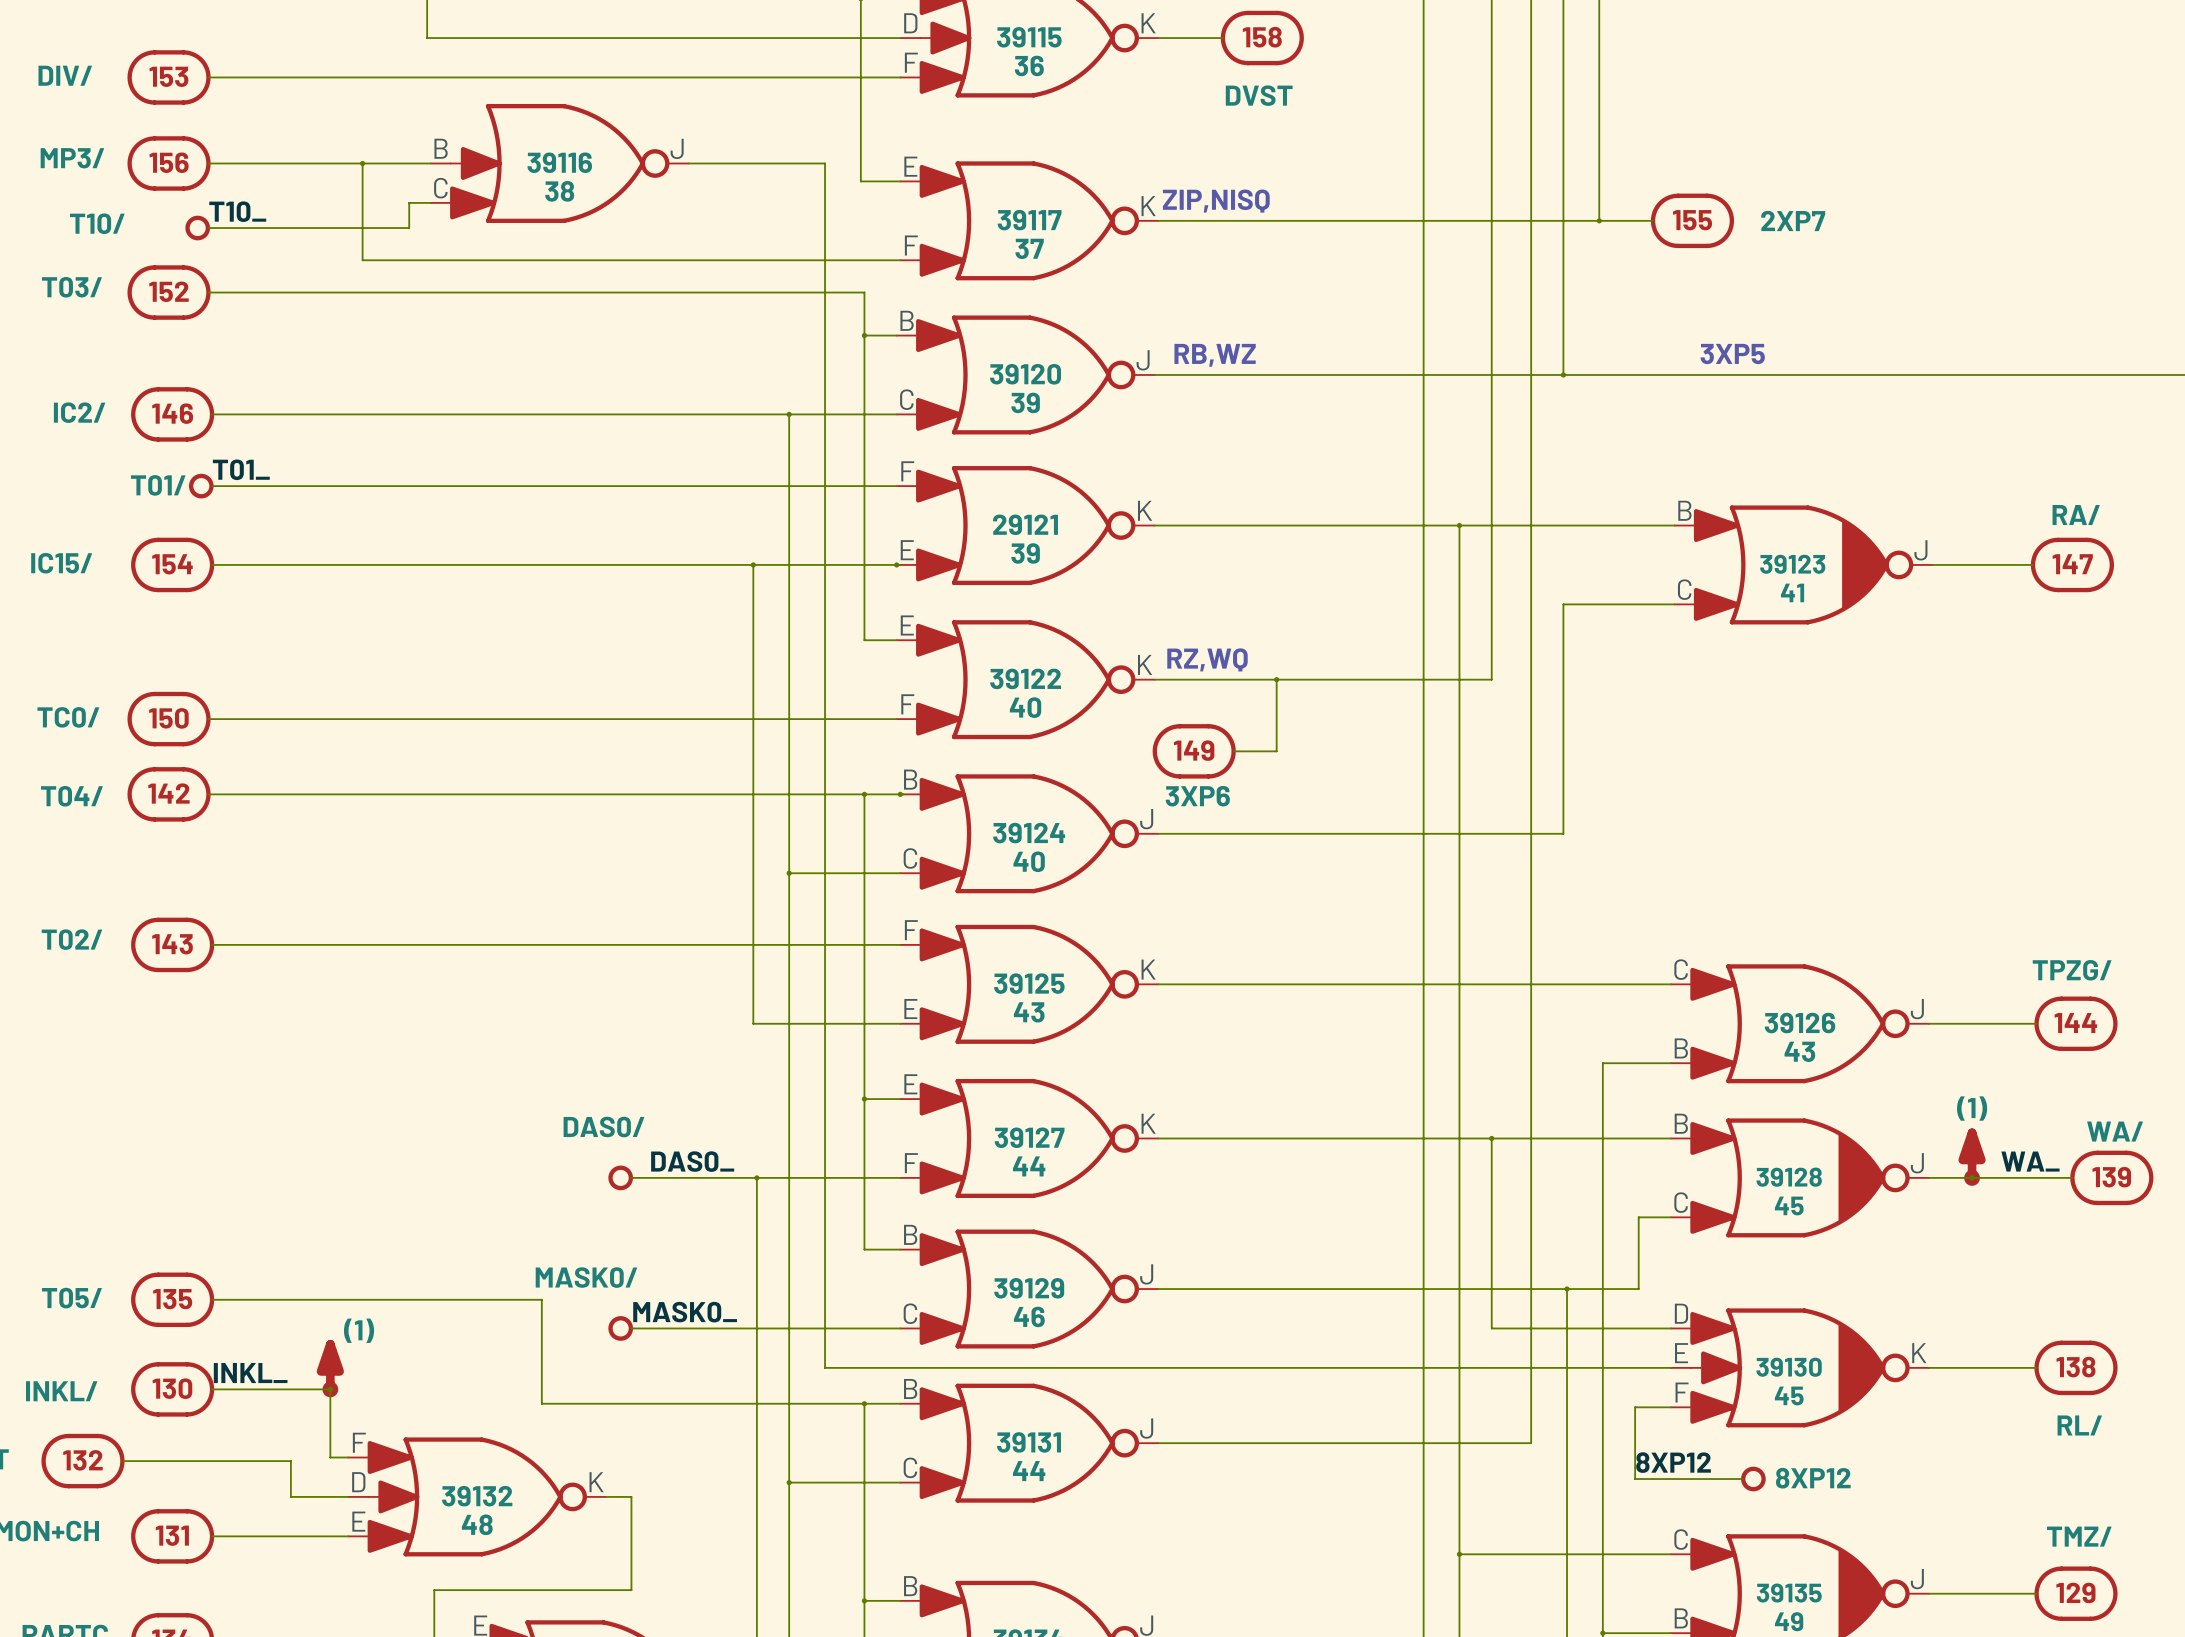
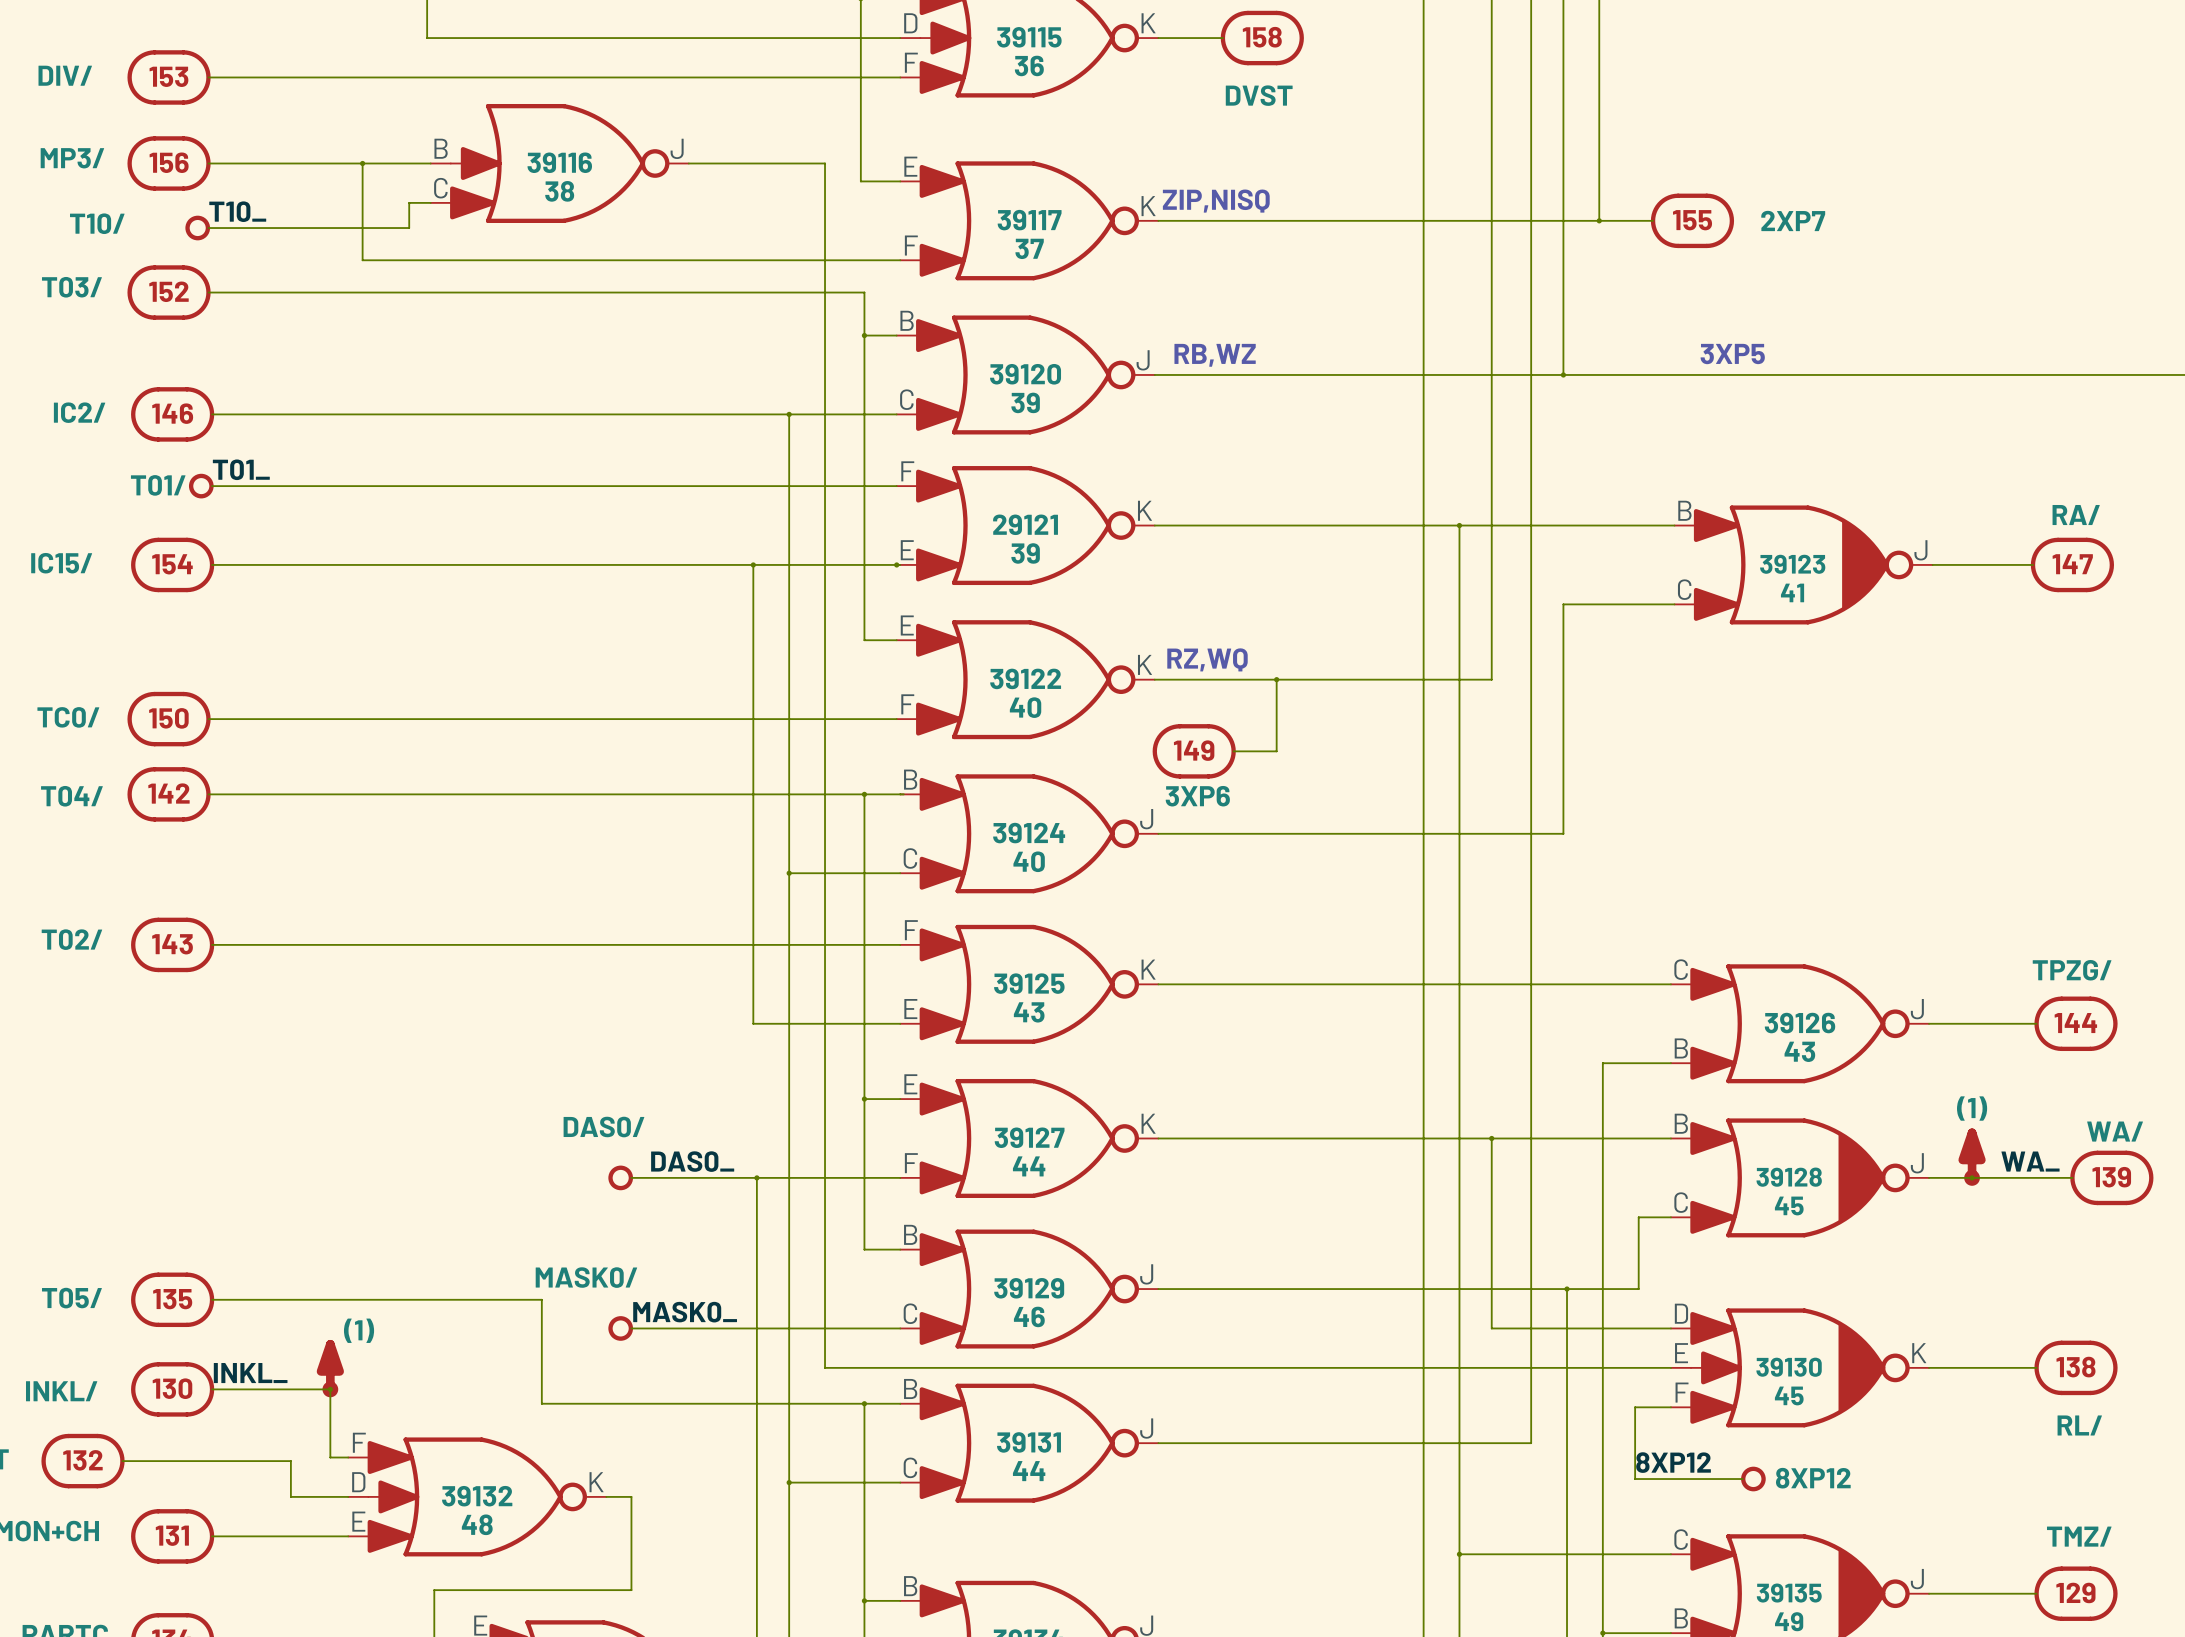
junction: (900, 794) -> none

